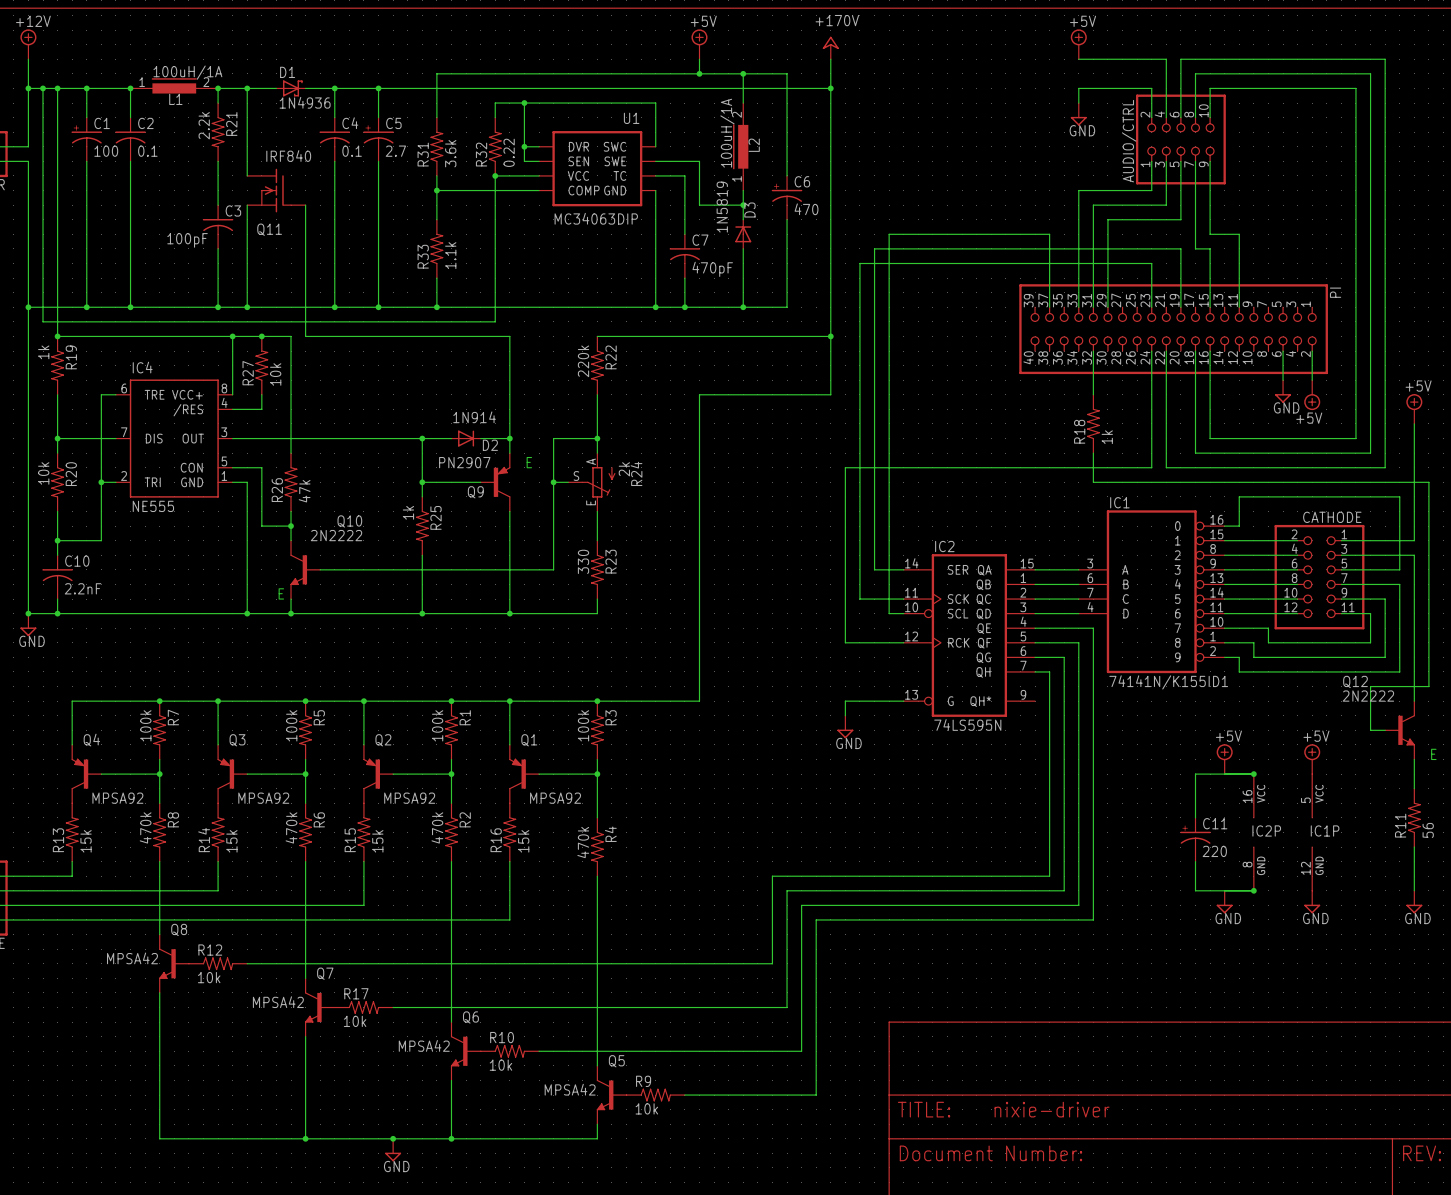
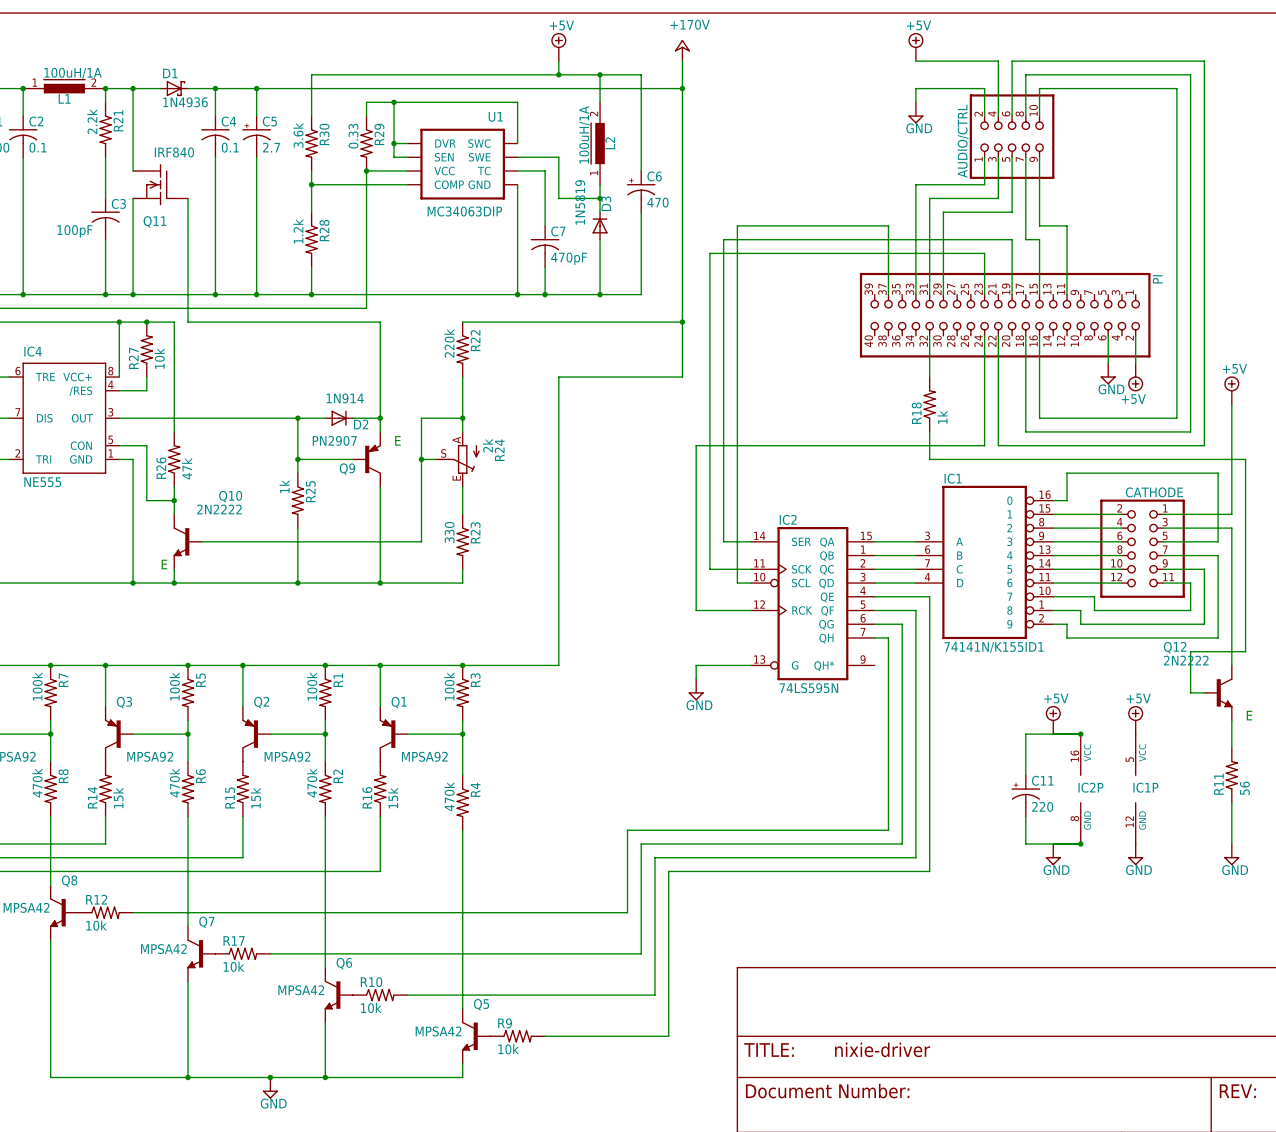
R31: 3.6k (436, 146) -> none
R30: none -> 3.6k (311, 143)
R32: 0.22 (495, 146) -> none
R29: none -> 0.33 (366, 143)
R33: 1.1k (436, 248) -> none
R28: none -> 1.2k (311, 239)

